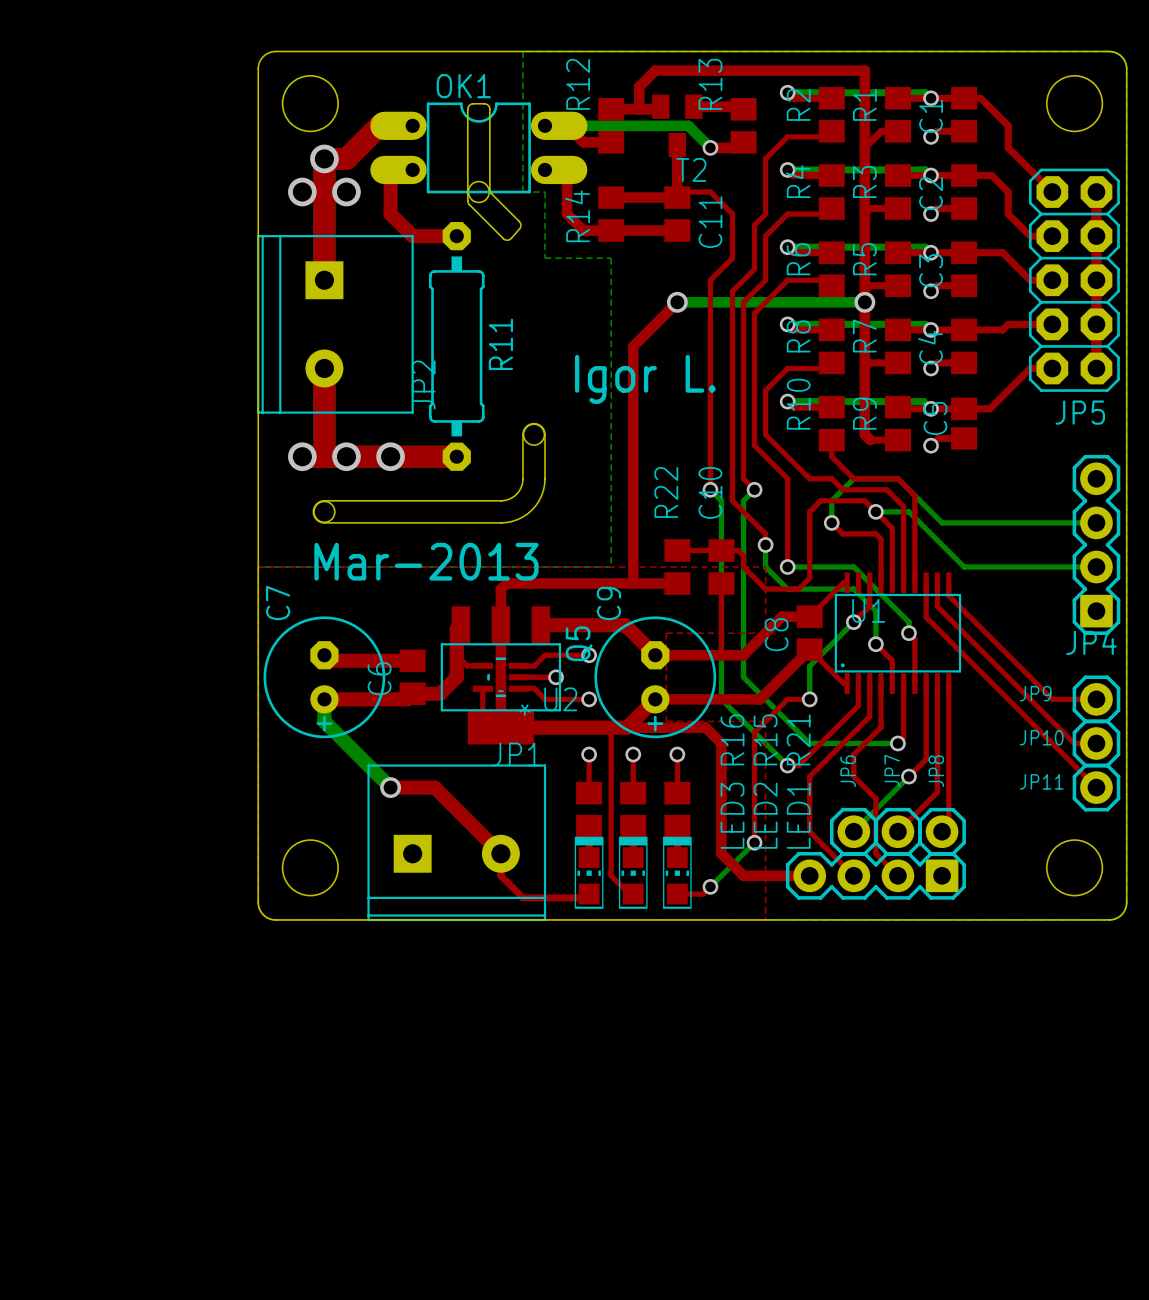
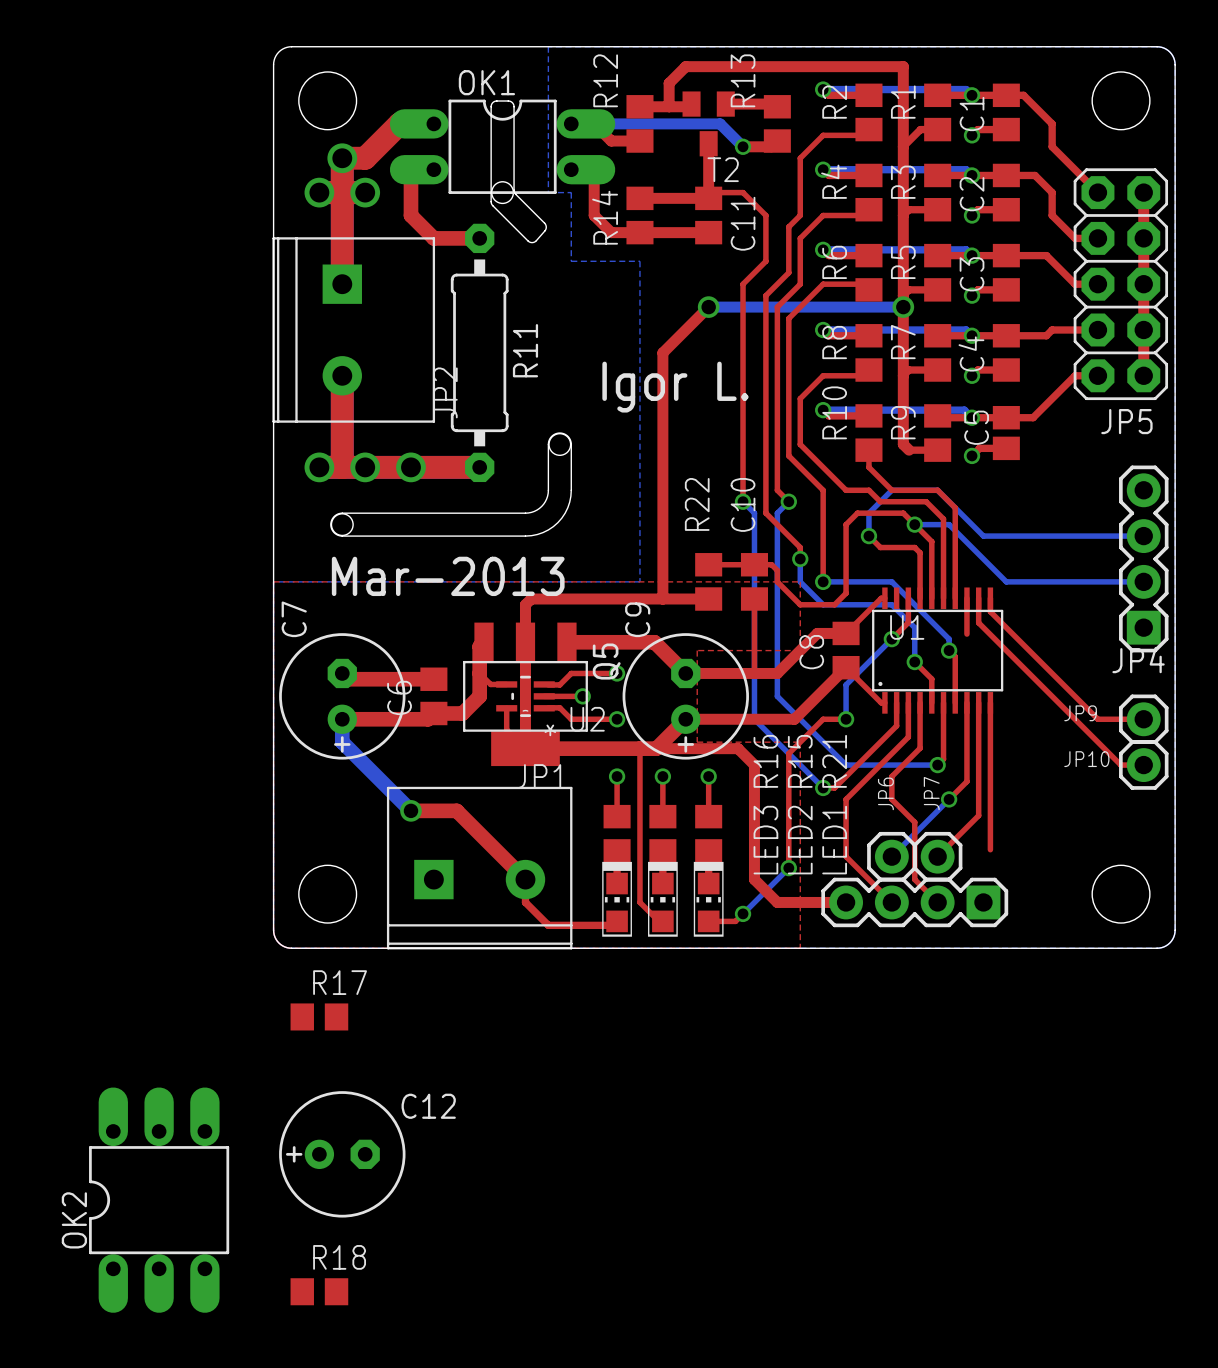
top track: (926, 617) (1096, 787) -> none
JP11: (1096, 787) -> none
JP8: (942, 831) -> none
R17: none -> (319, 1016)
C12: none -> (342, 1154)
OK2: none -> (159, 1200)
R18: none -> (319, 1291)

